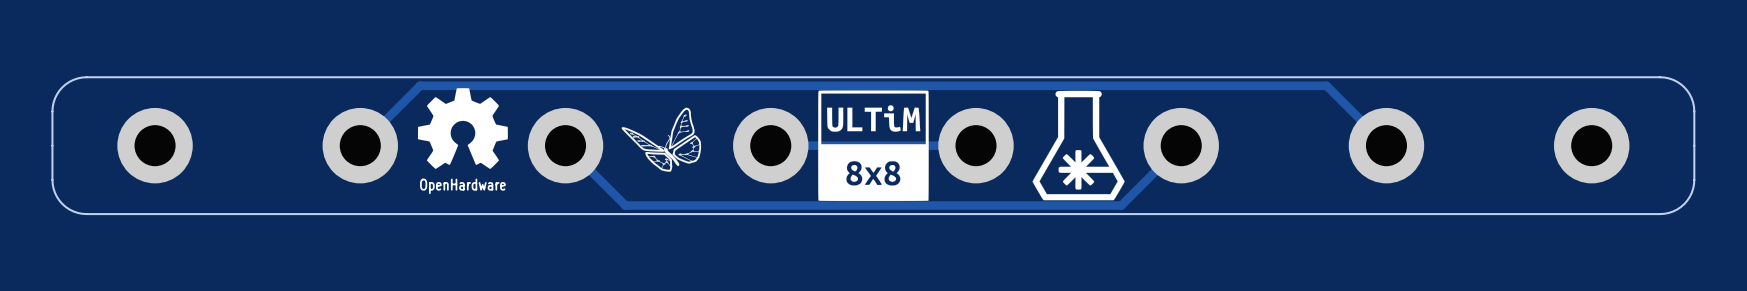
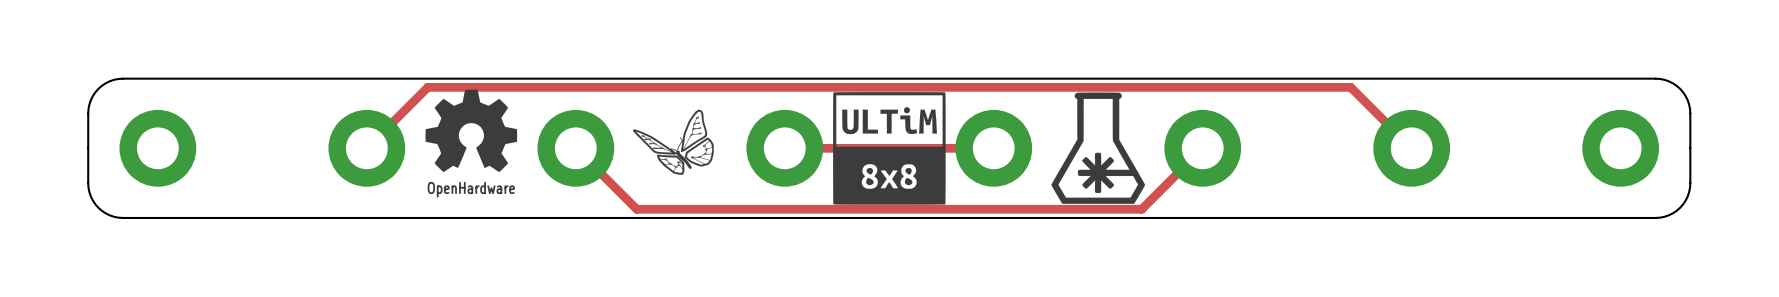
board edge: (120, 77) (82, 77) (69, 81) (57, 94) (52, 111) (52, 179) (57, 196) (65, 207) (77, 212) (120, 214) -> (123, 78) (109, 81) (98, 88) (90, 100) (88, 113) (89, 192) (92, 200) (101, 210) (109, 215) (123, 217)
board edge: (1625, 77) (1664, 77) (1677, 81) (1689, 94) (1694, 111) (1694, 179) (1689, 196) (1680, 207) (1668, 212) (1625, 214) -> (1655, 78) (1668, 81) (1680, 88) (1687, 100) (1690, 113) (1689, 192) (1685, 200) (1676, 210) (1664, 216) (1655, 217)

